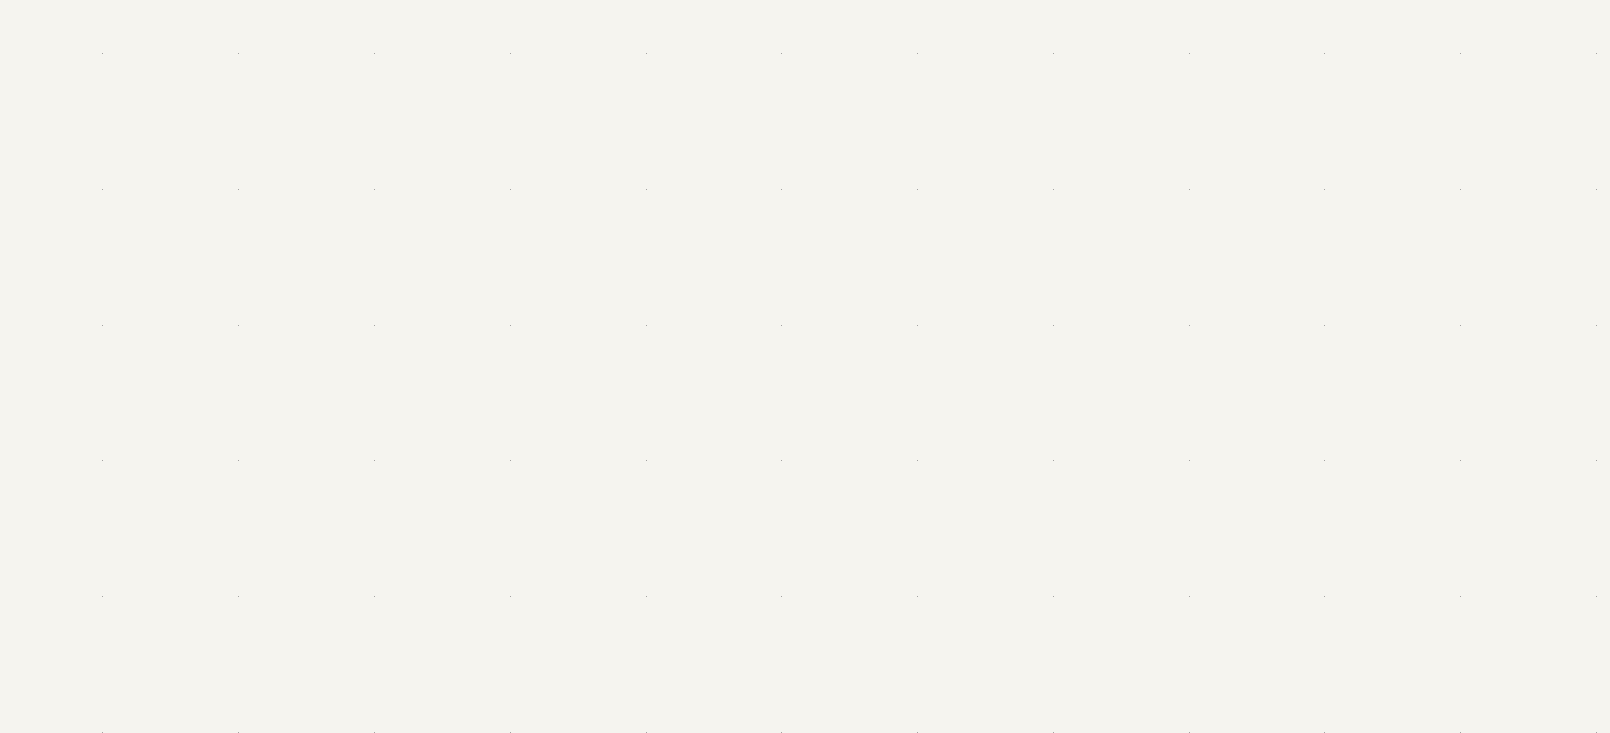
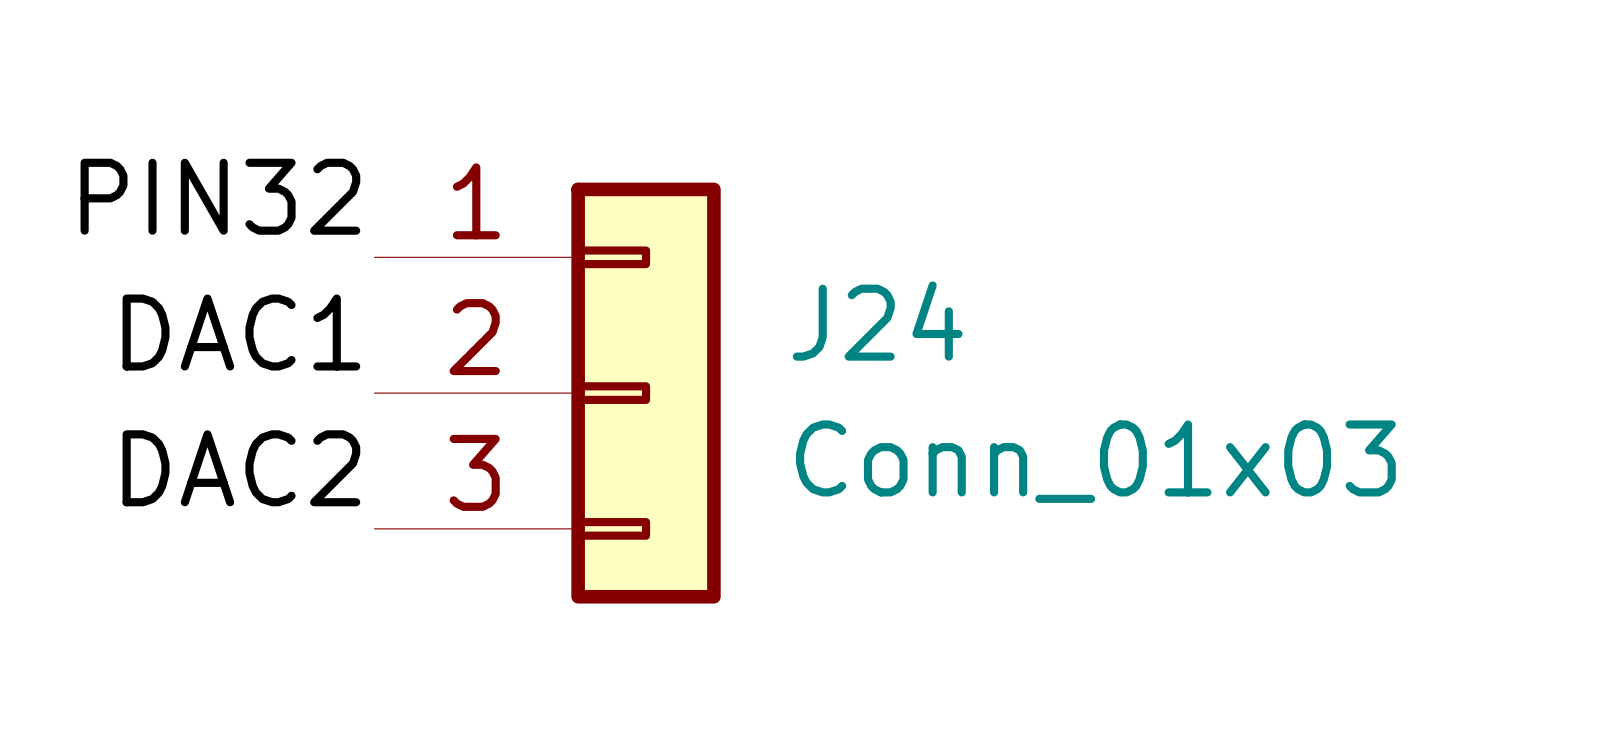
label: none -> PIN32 (220, 196)
label: none -> DAC1 (241, 332)
J24: none -> Conn_01x03 (547, 393)
label: none -> DAC2 (241, 468)

